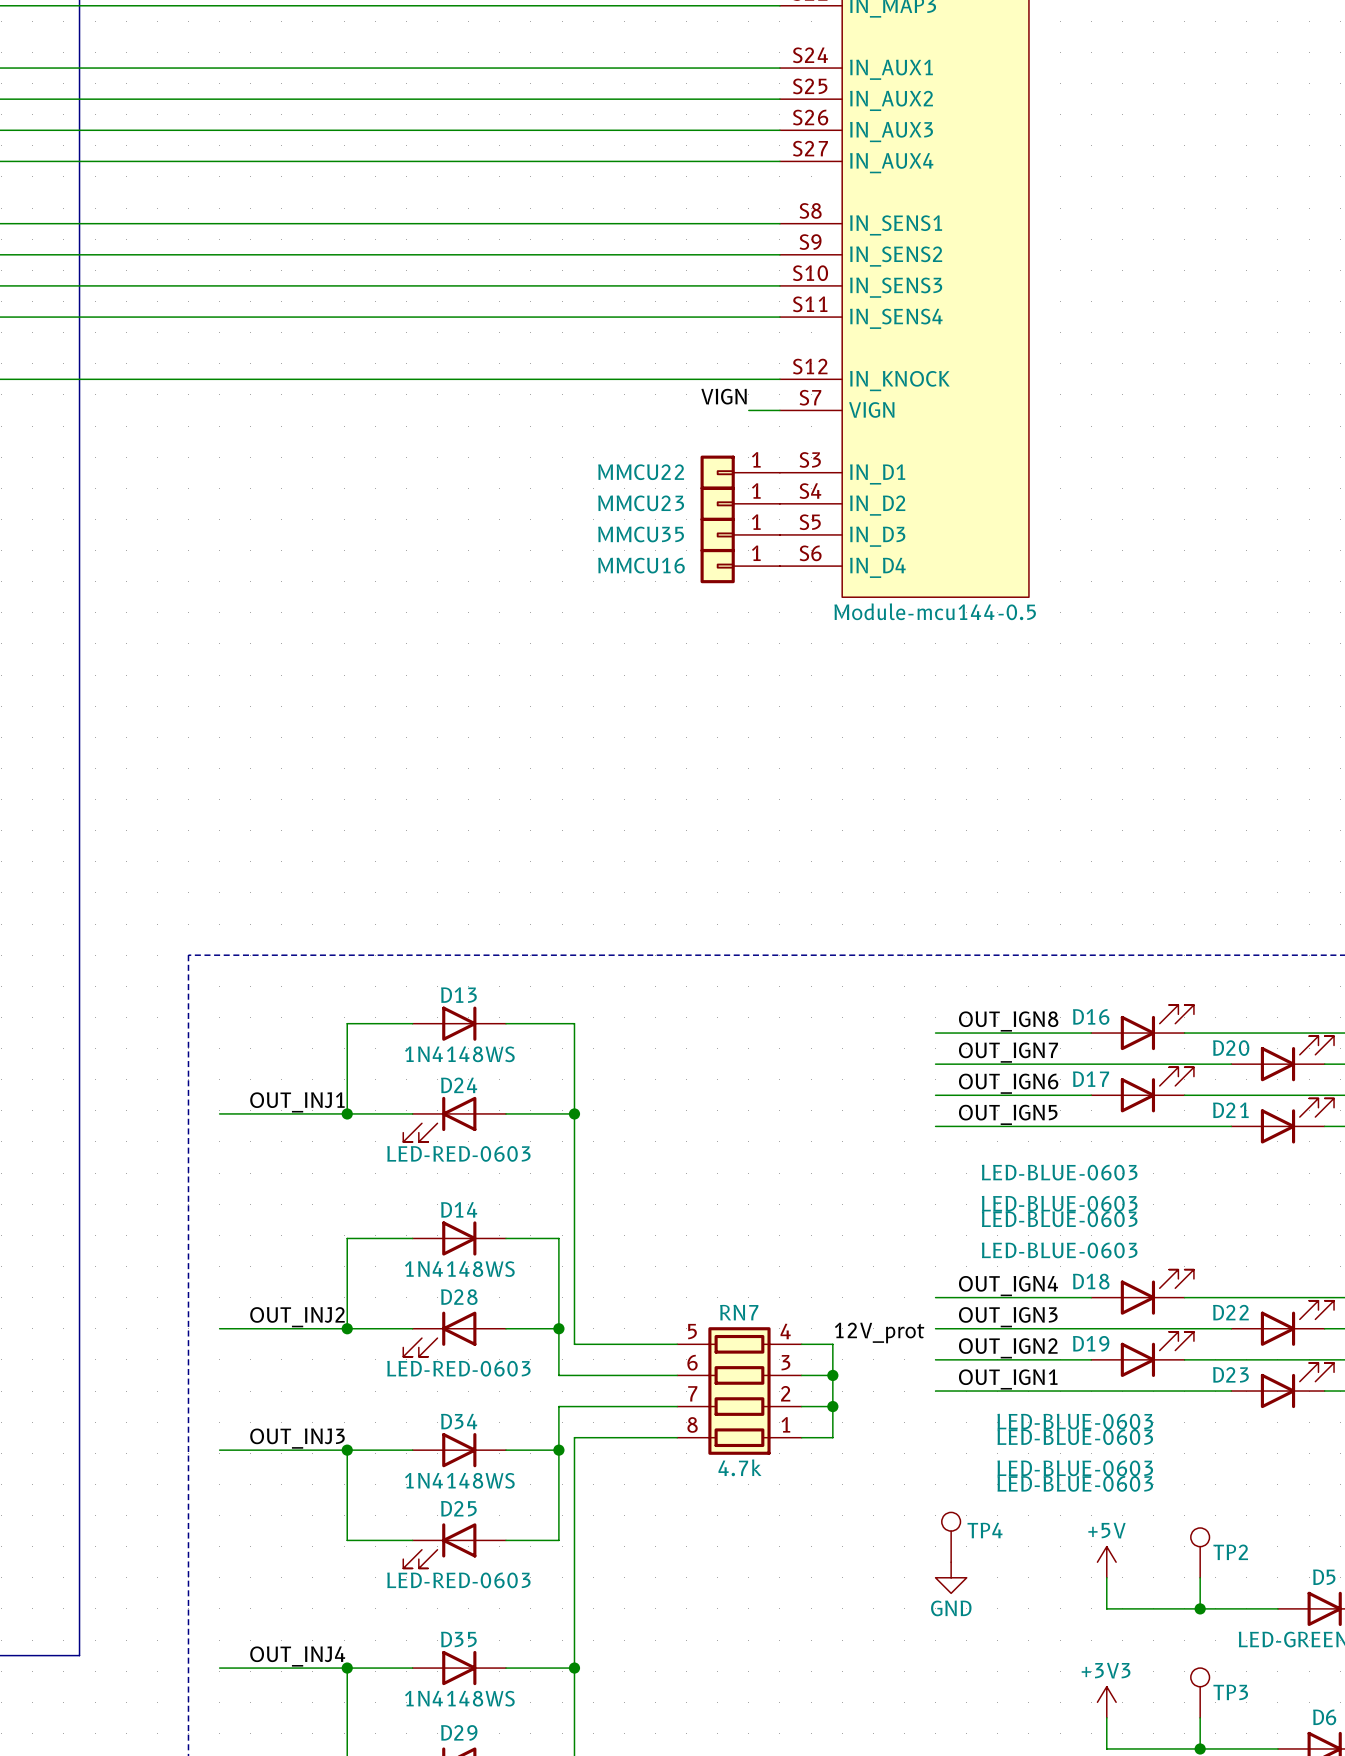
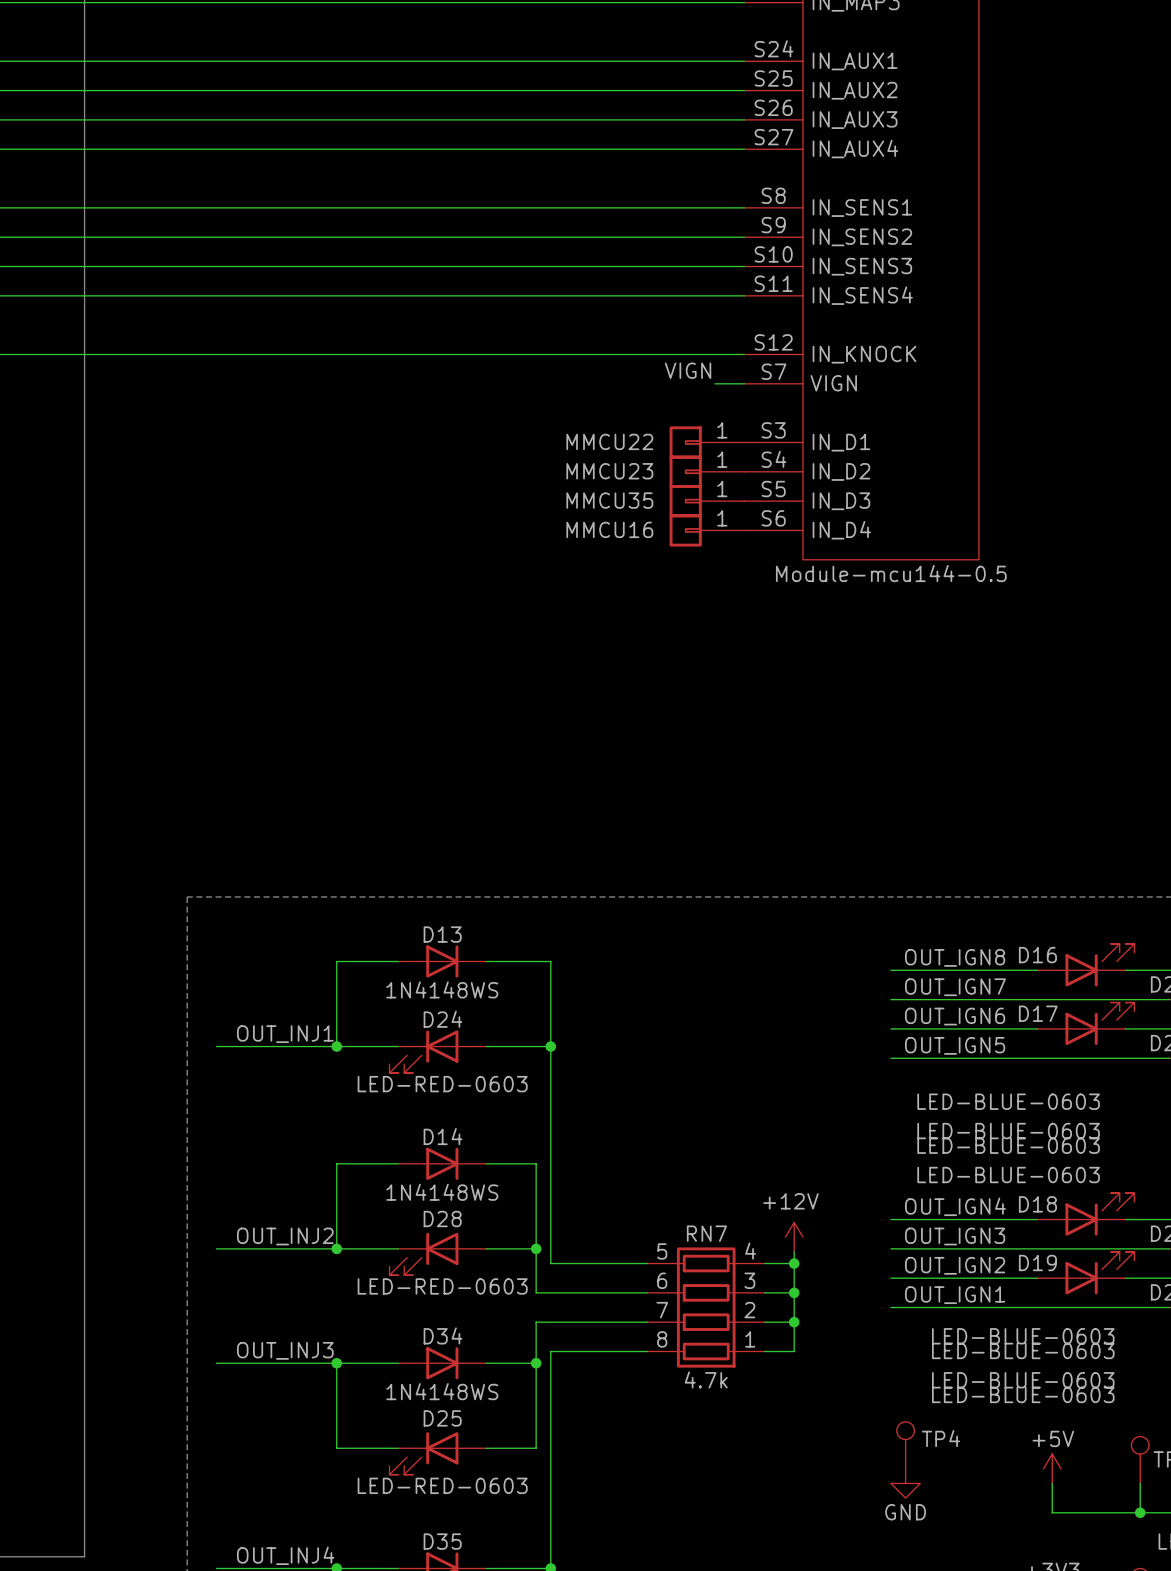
power symbol: none -> +12V (794, 1237)
wire: none -> (794, 1251) (794, 1263)
label: 12V_prot (879, 1332) -> none
junction: none -> (794, 1263)

